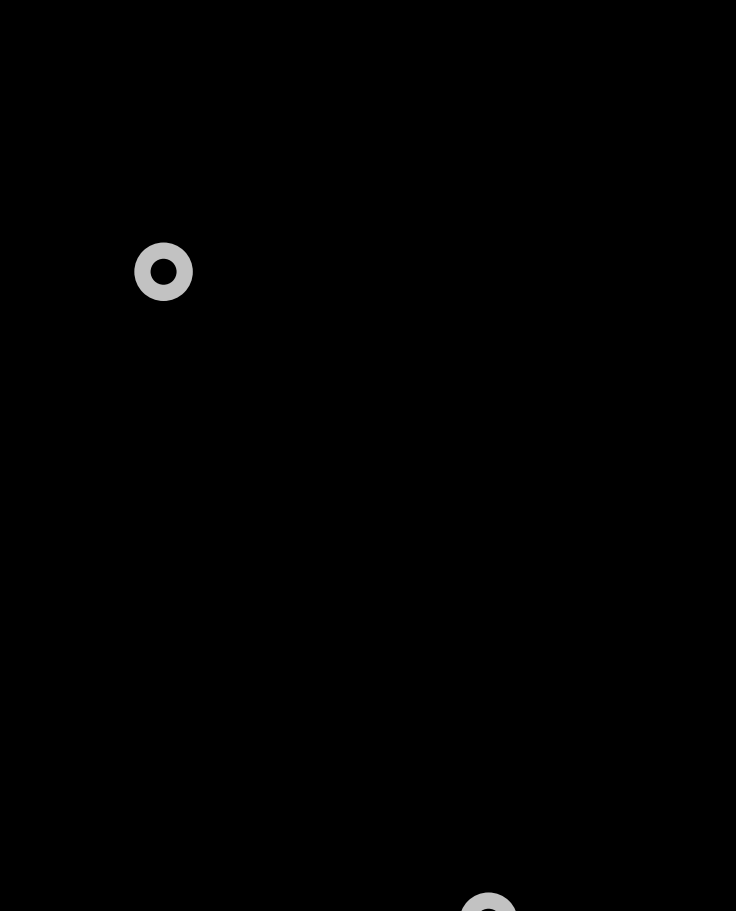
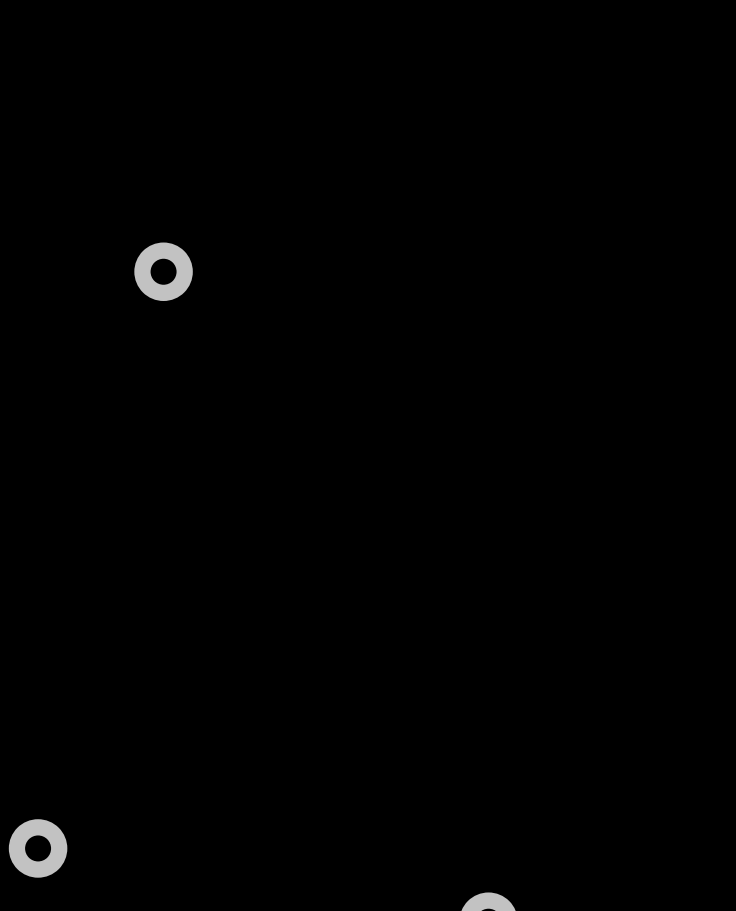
via: none -> (38, 848)

